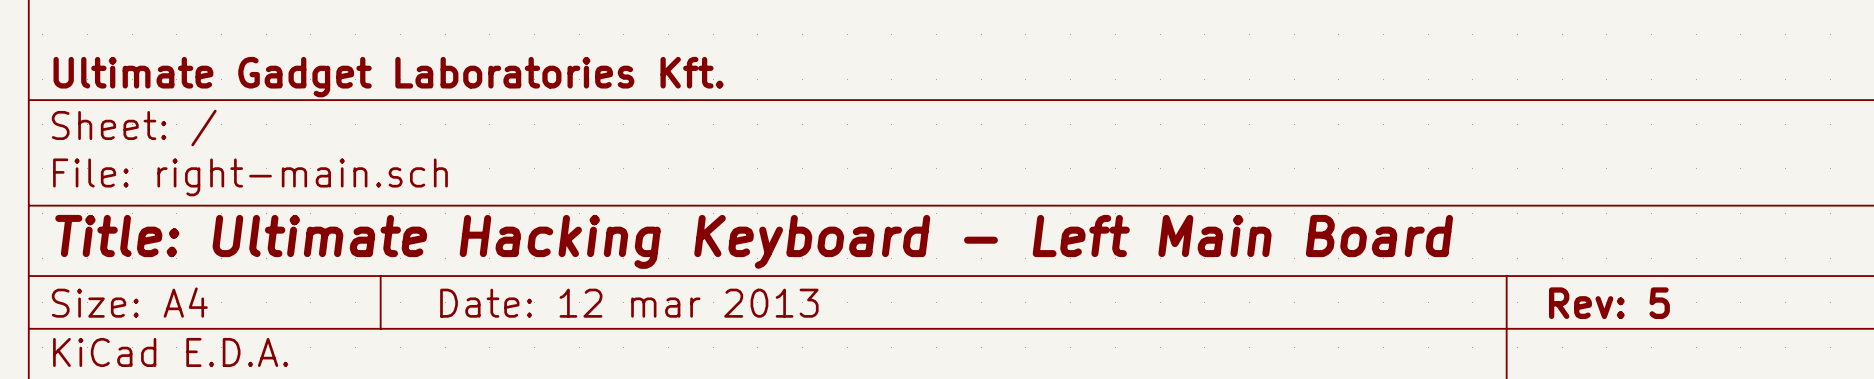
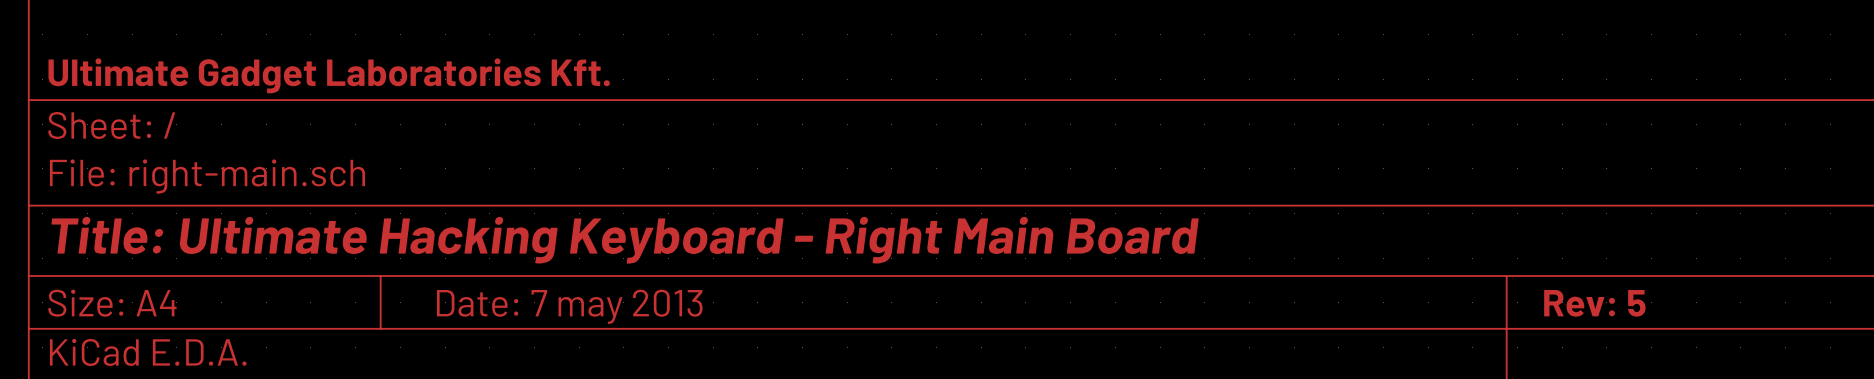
title block: Title: Ultimate Hacking Keyboard - Left Main Board (754, 241) -> Title: Ultimate Hacking Keyboard - Right Main Board (625, 240)
title block: Date: 12 mar 2013 (629, 303) -> Date: 7 may 2013 (569, 306)

